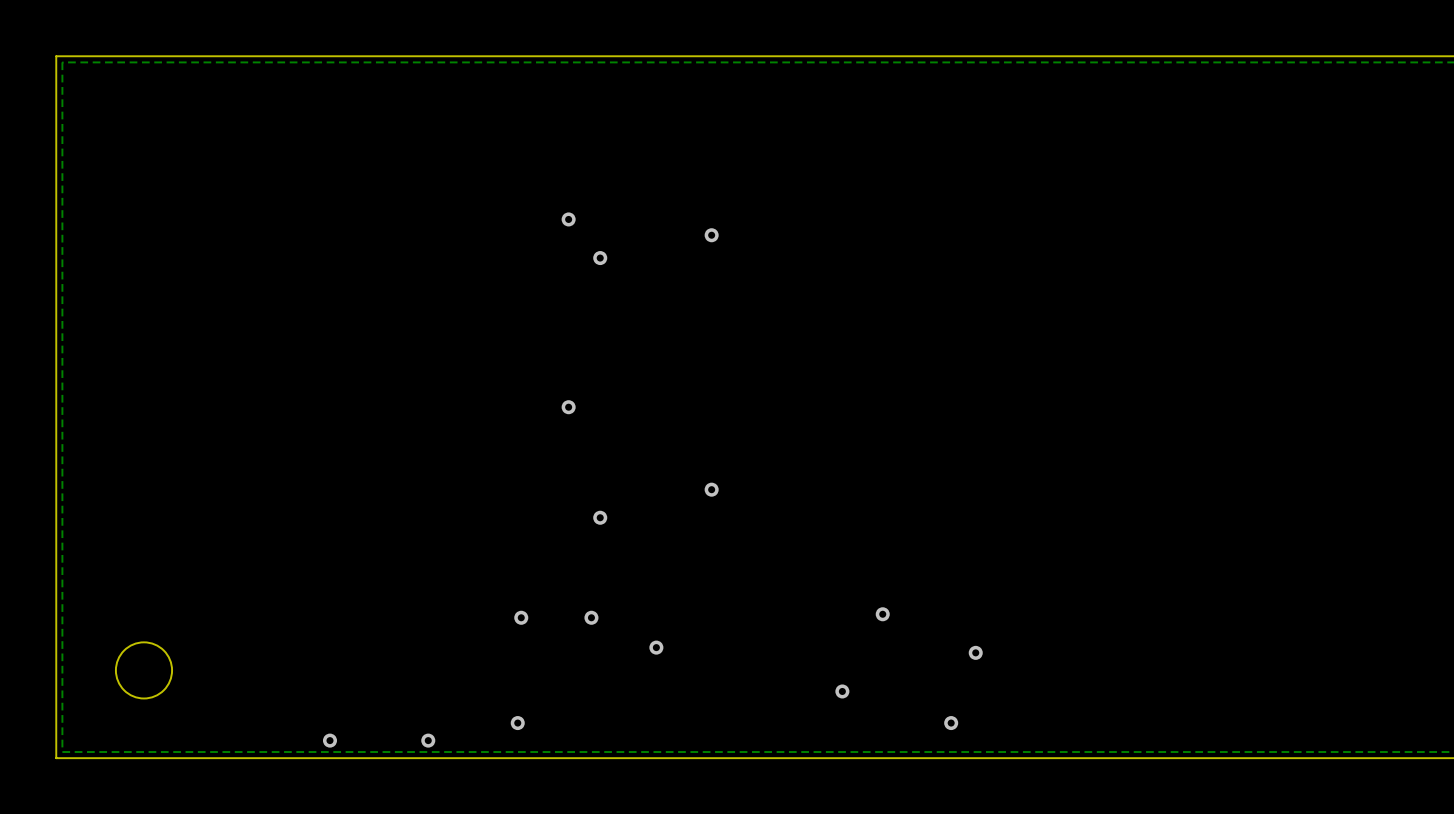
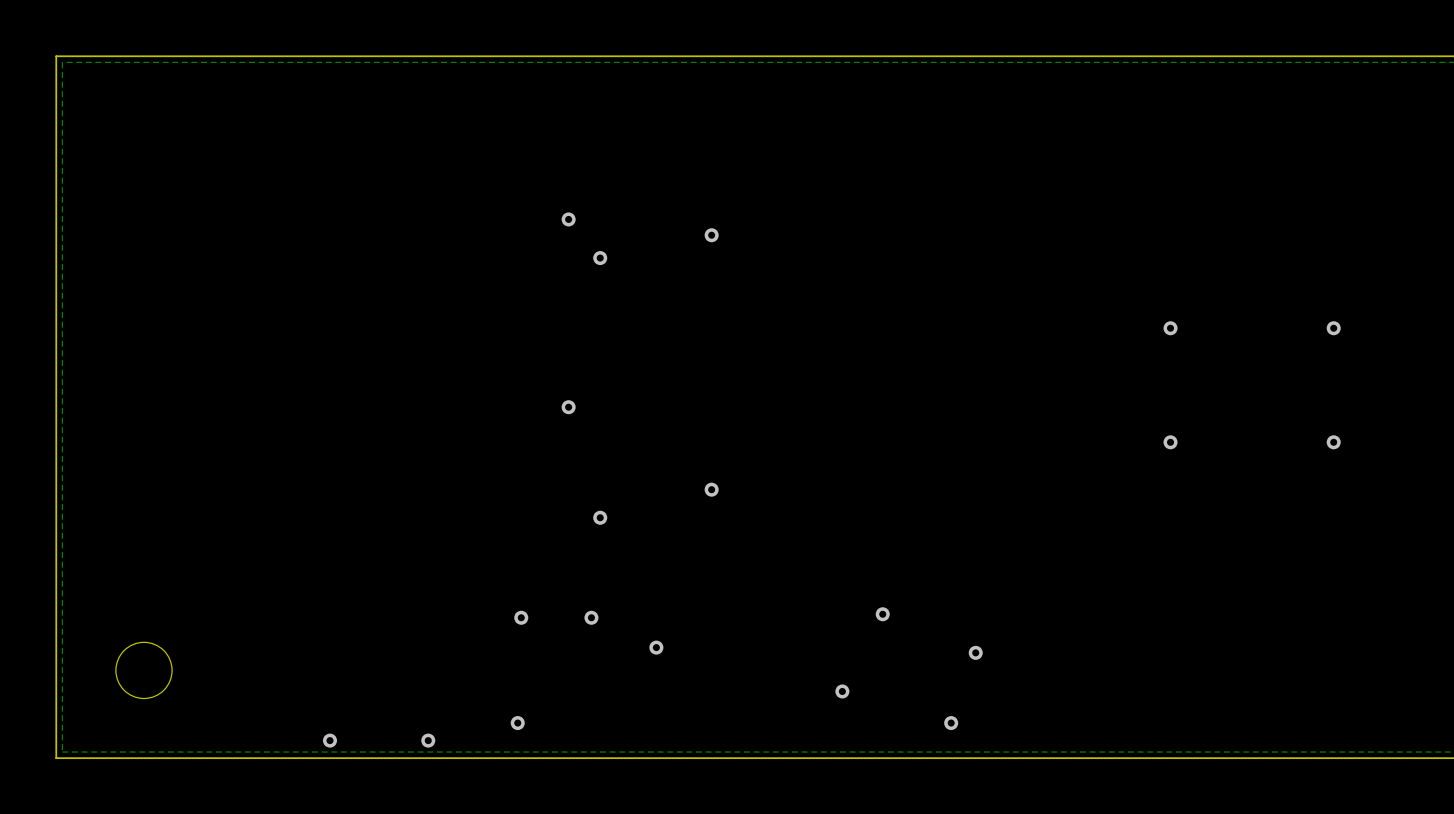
via: none -> (1170, 328)
via: none -> (1333, 328)
via: none -> (1170, 442)
via: none -> (1333, 442)

